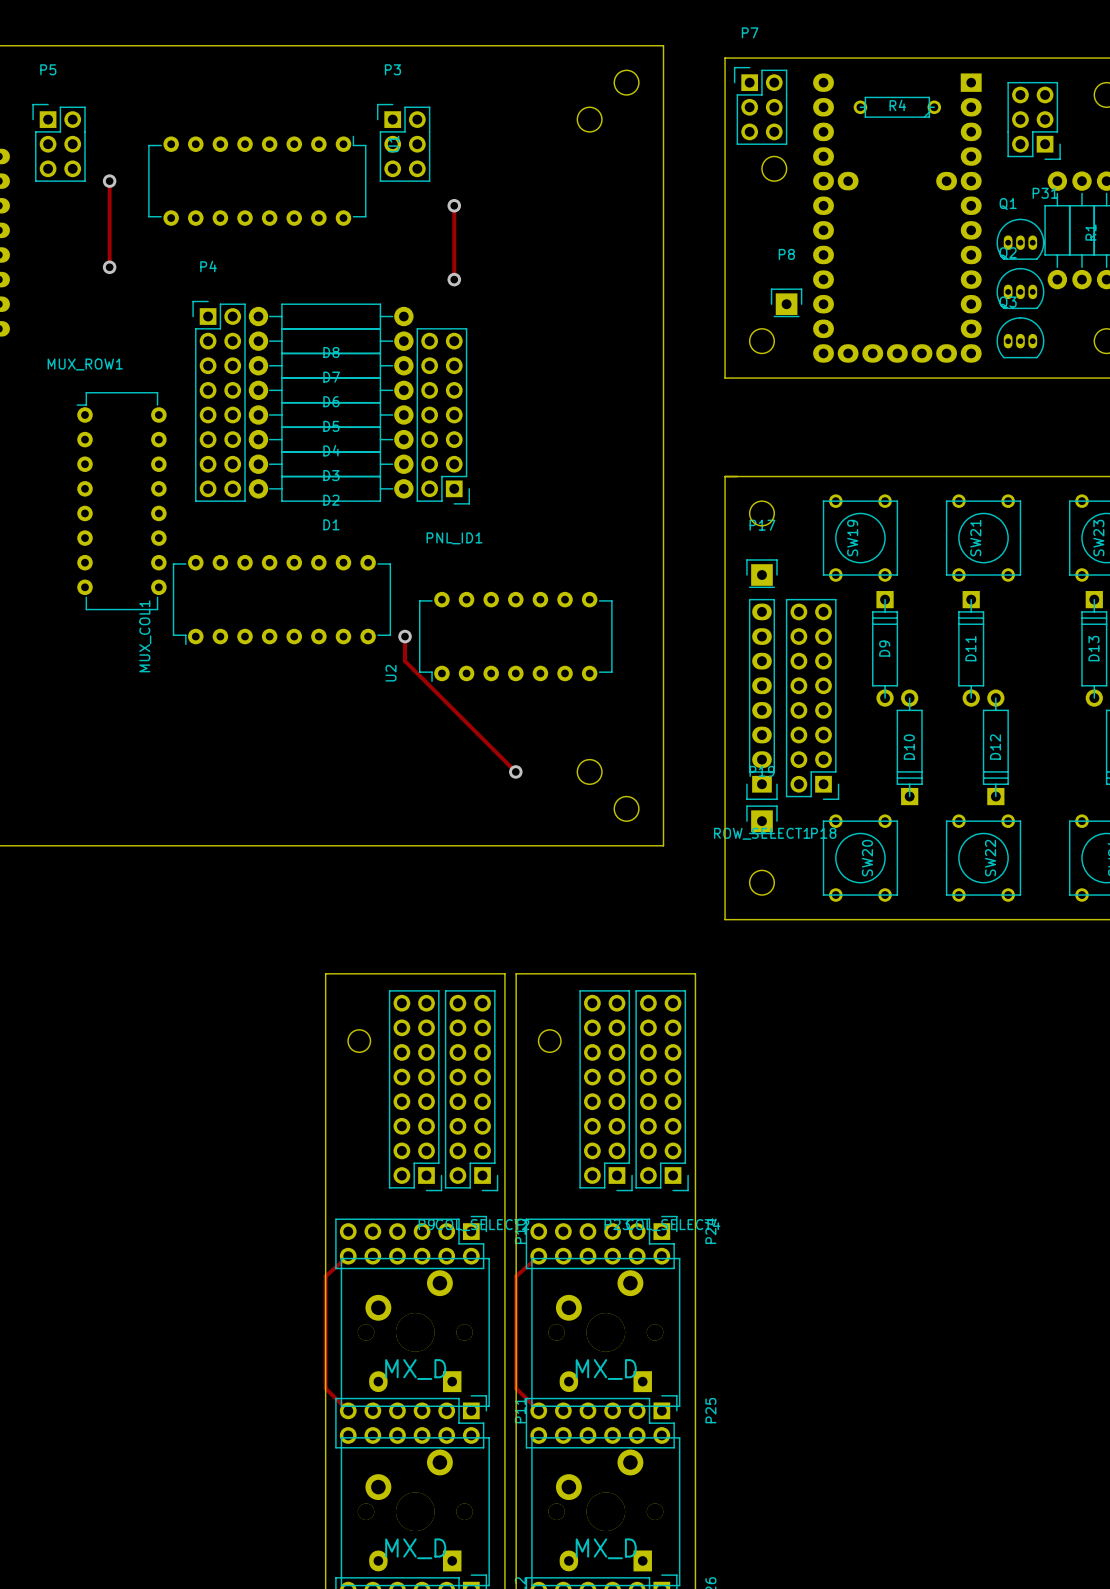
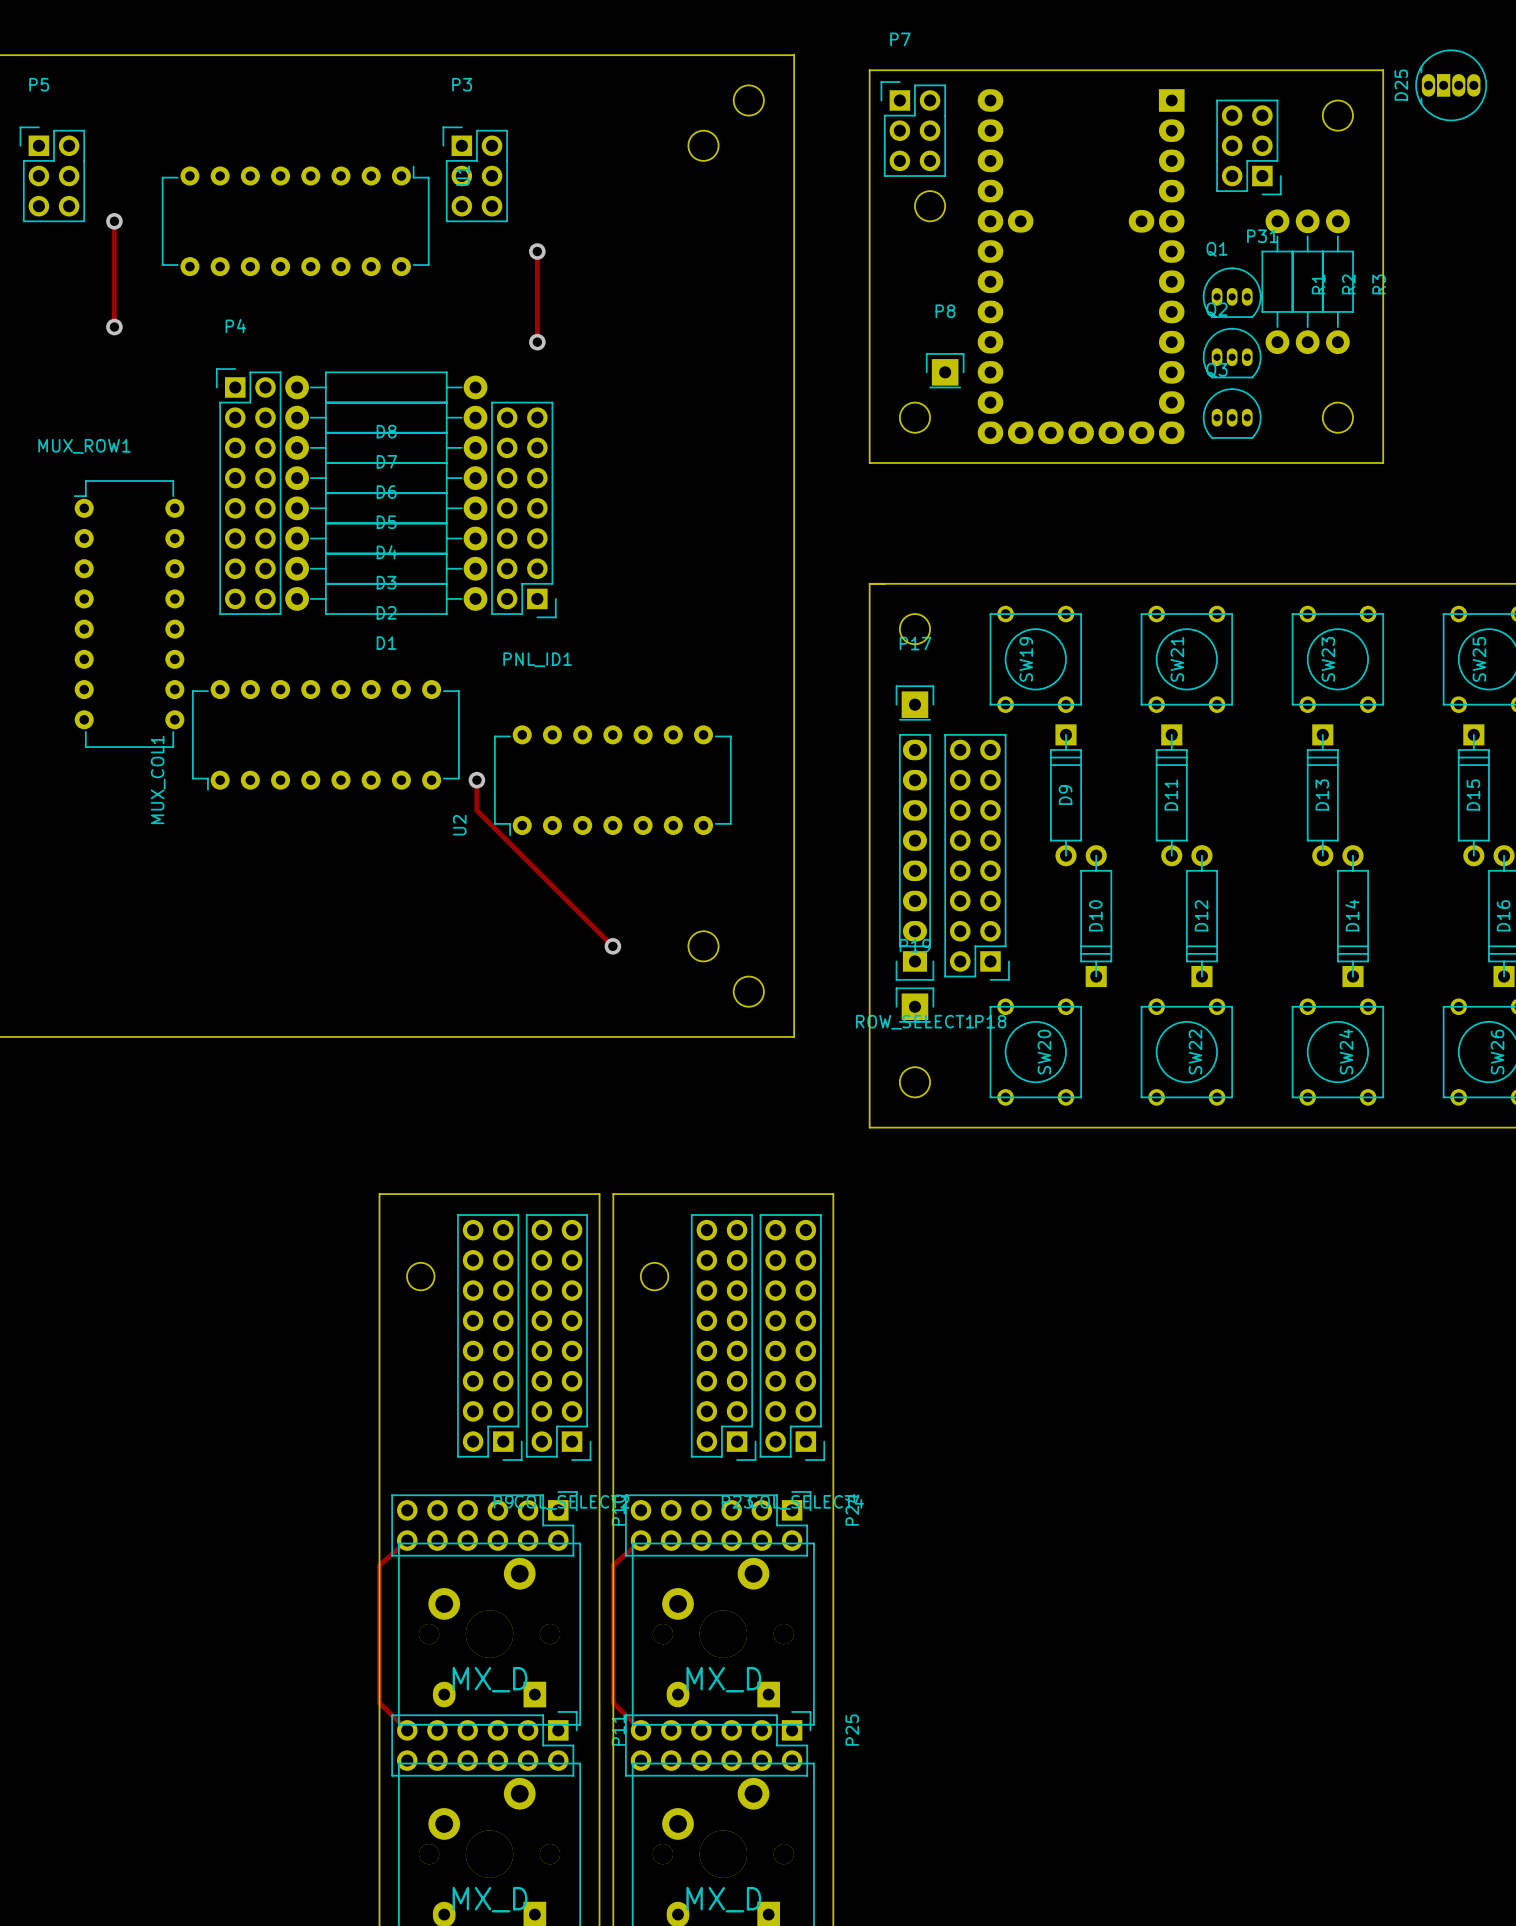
R4: (897, 107) -> none

